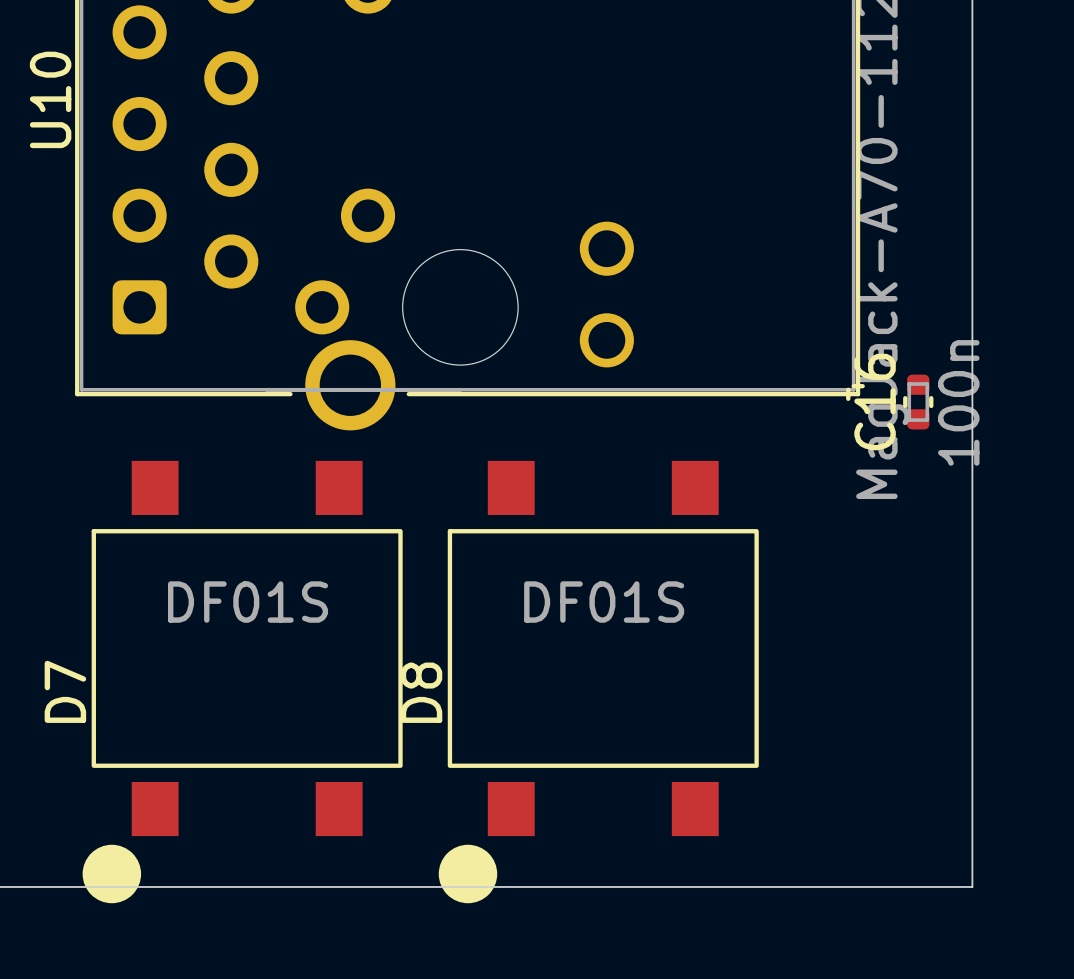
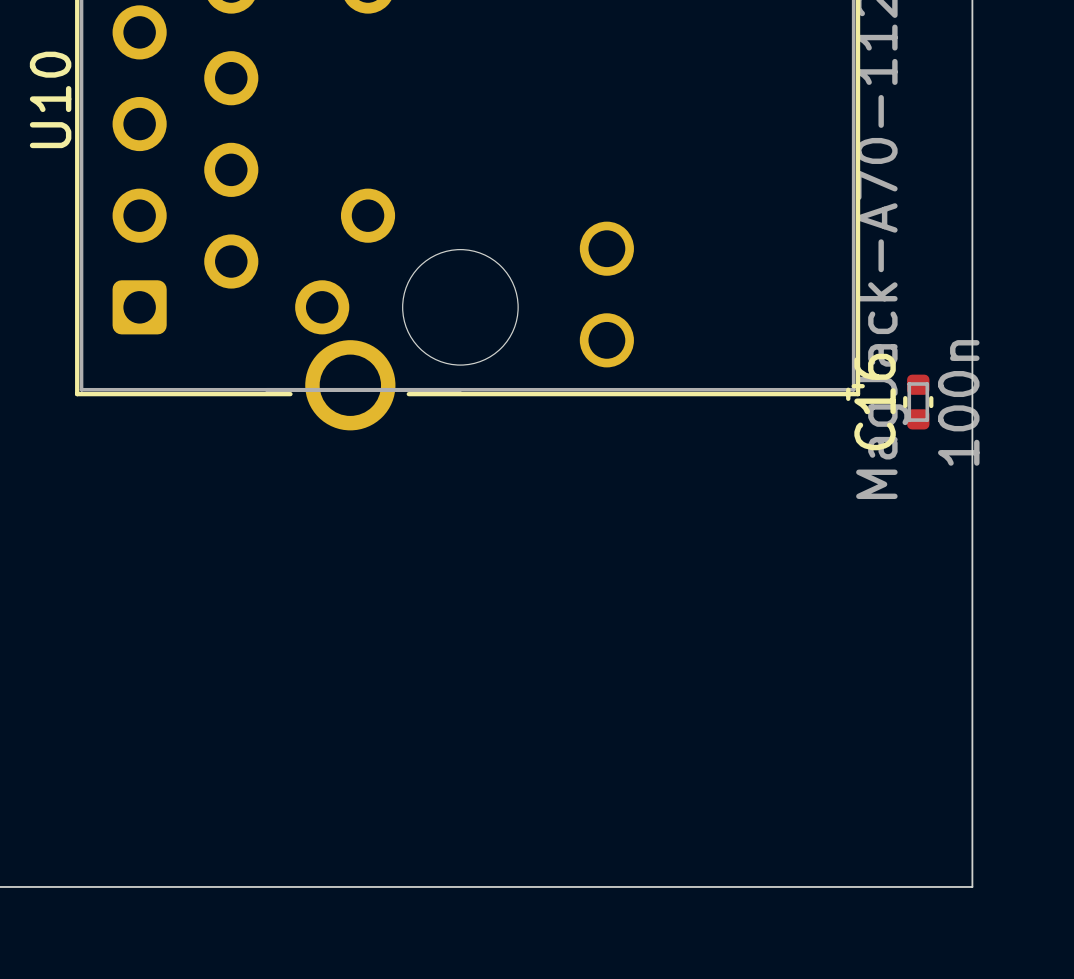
D7: DF01S (242, 682) -> none
D8: DF01S (598, 682) -> none

